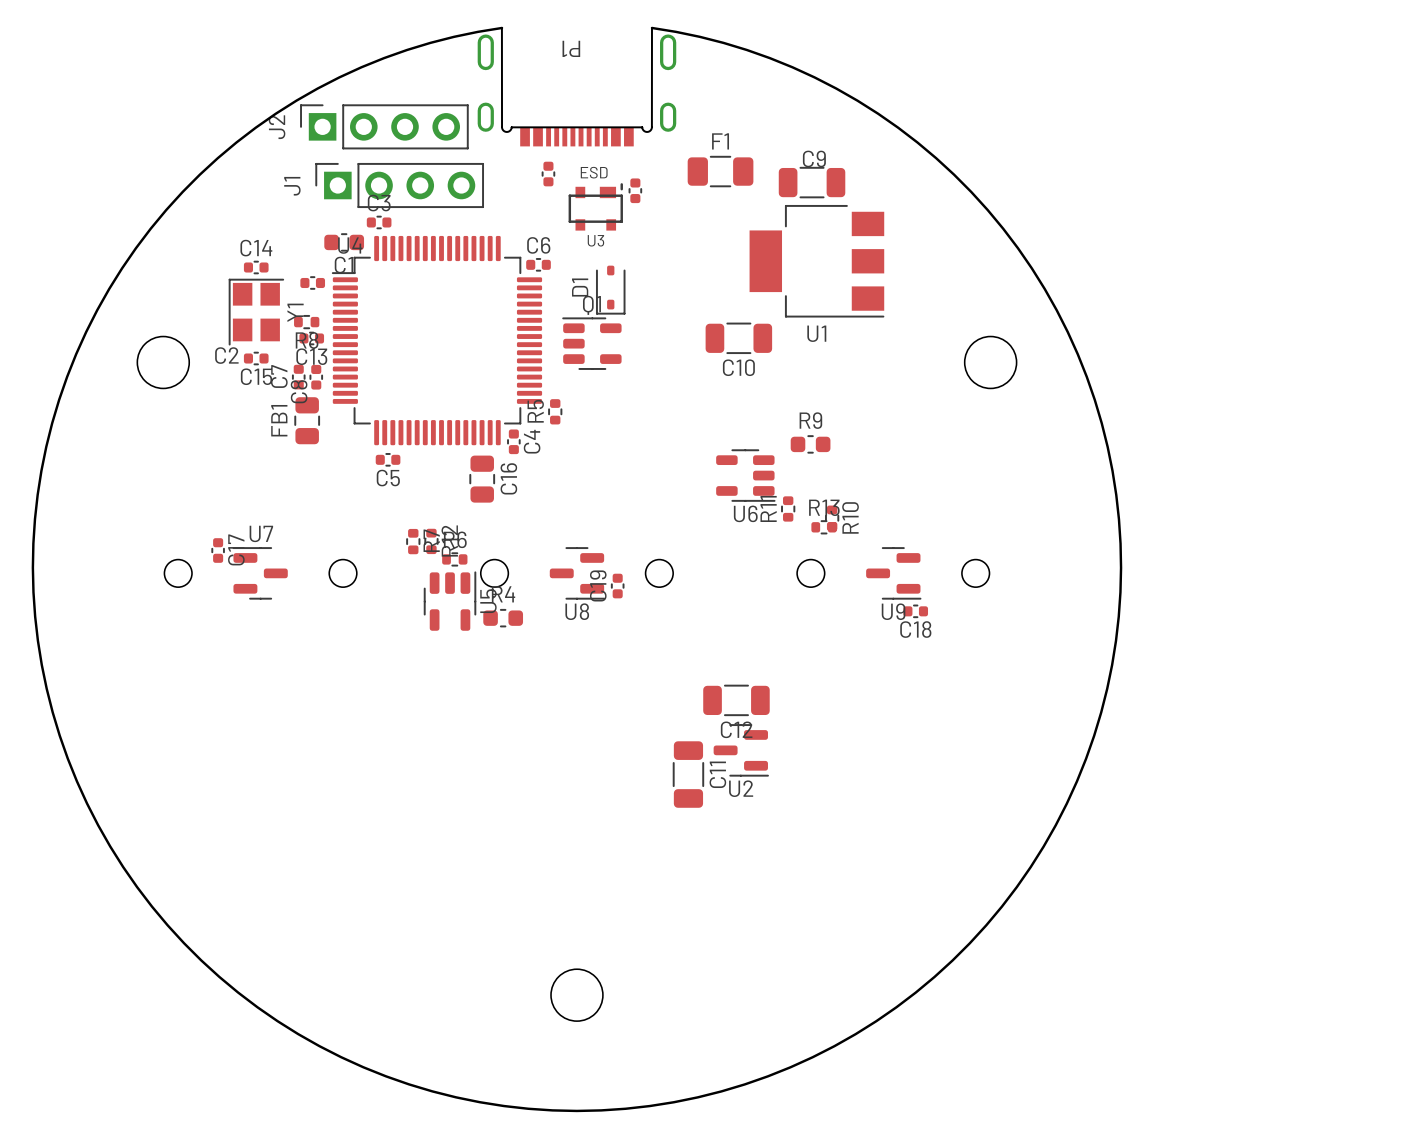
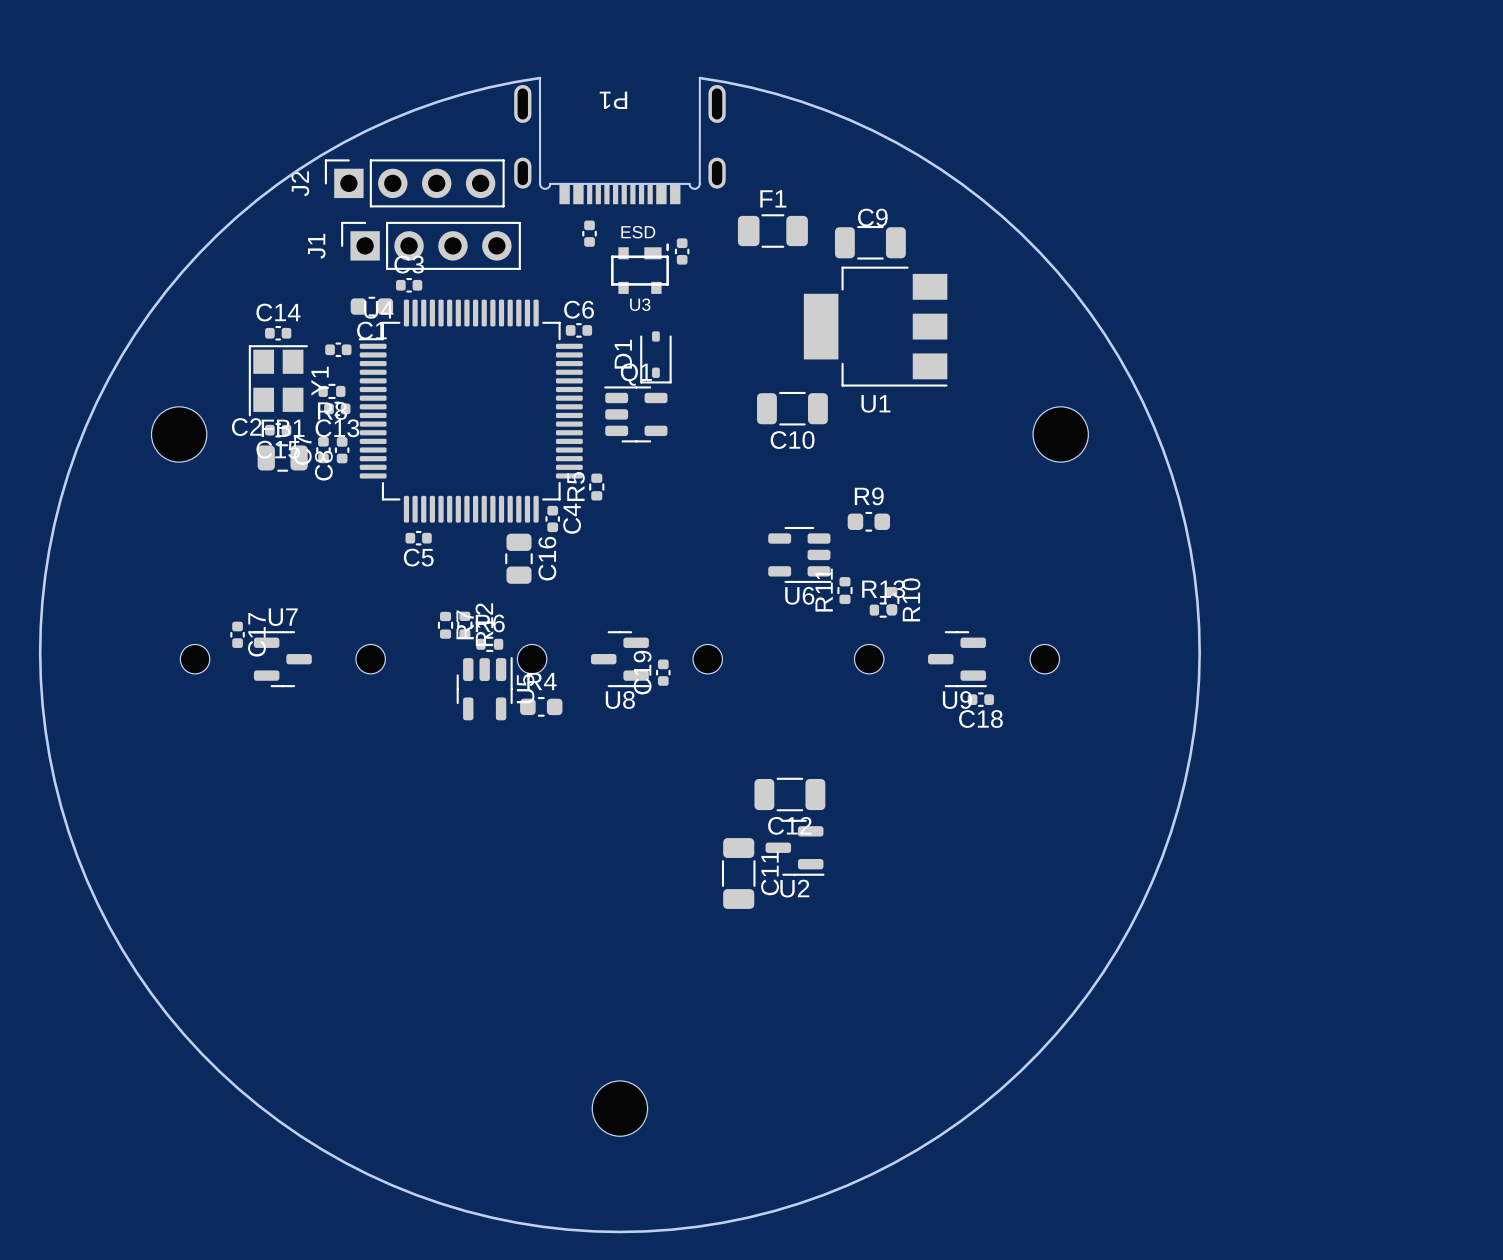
FB1 rotation: 0° (307, 420) -> 90° clockwise (282, 457)
FB1 position: (307, 420) -> (282, 457)

